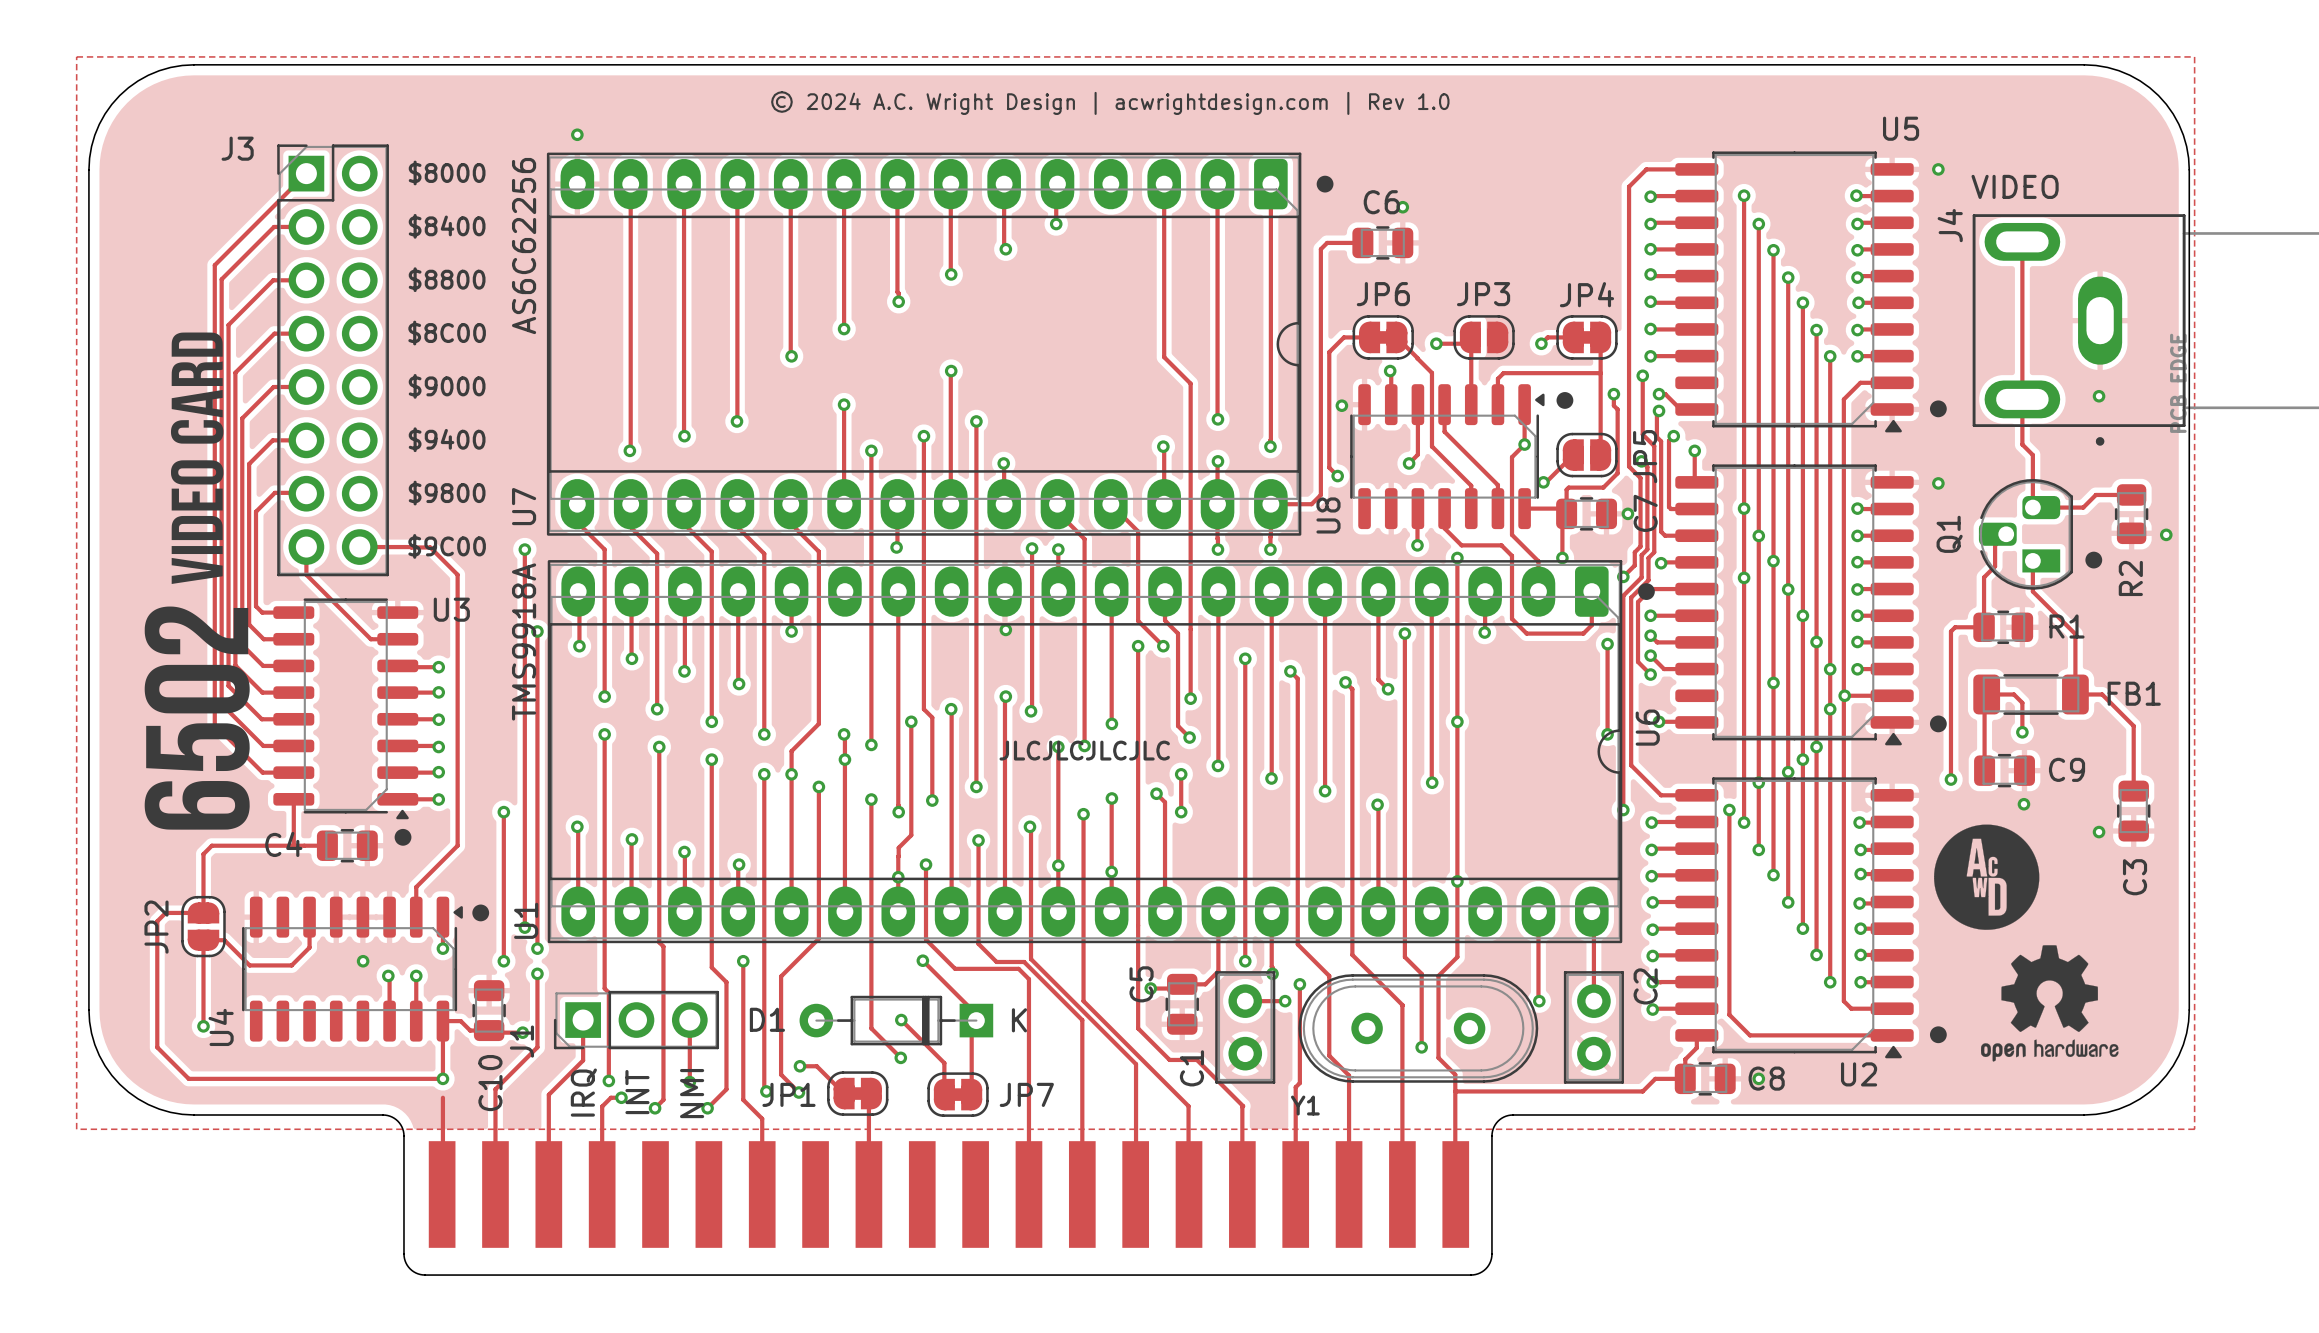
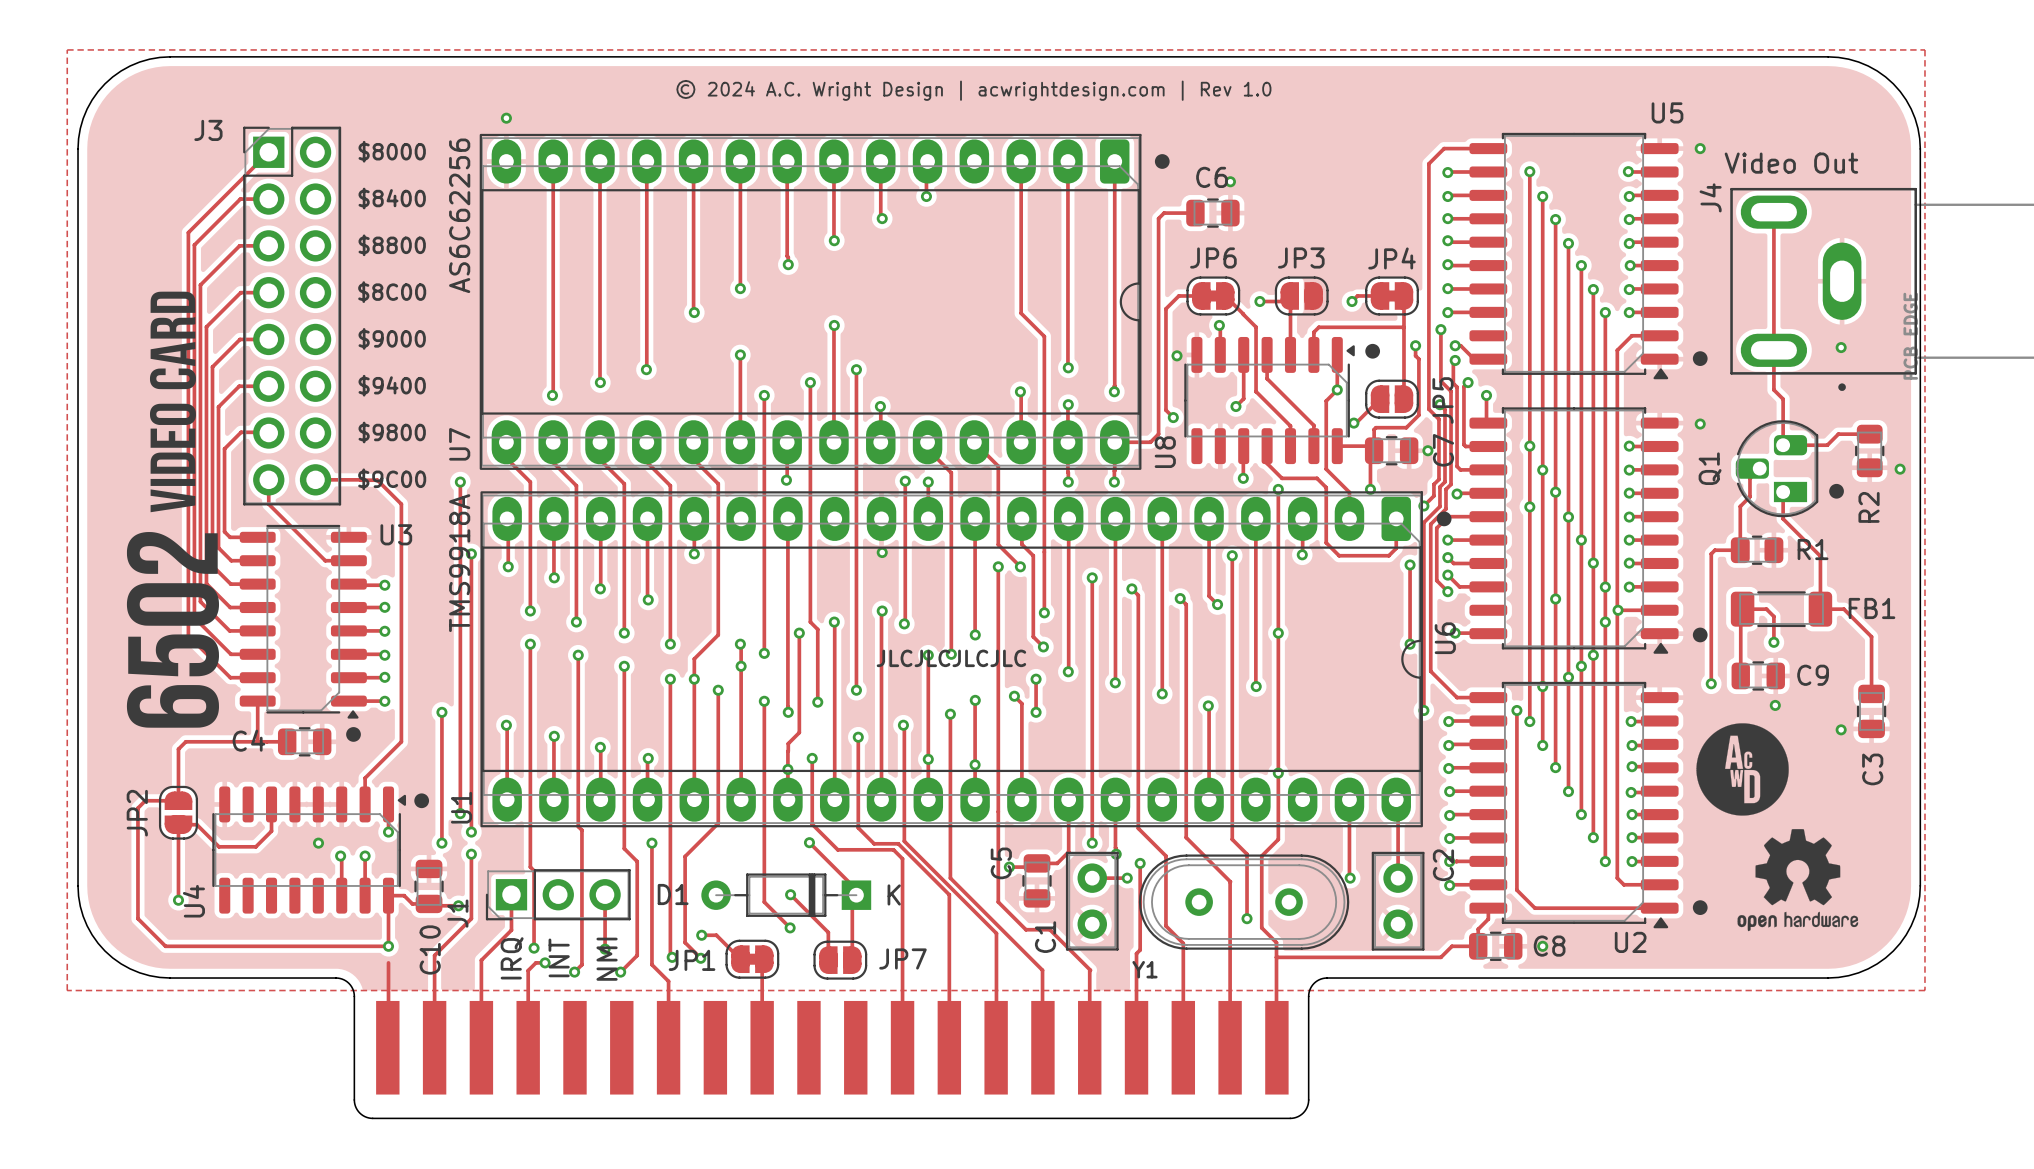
J4 value: VIDEO (2015, 186) -> Video Out (1791, 163)
JP7 footprint: [927, 1072, 989, 1117] -> [813, 940, 868, 980]

